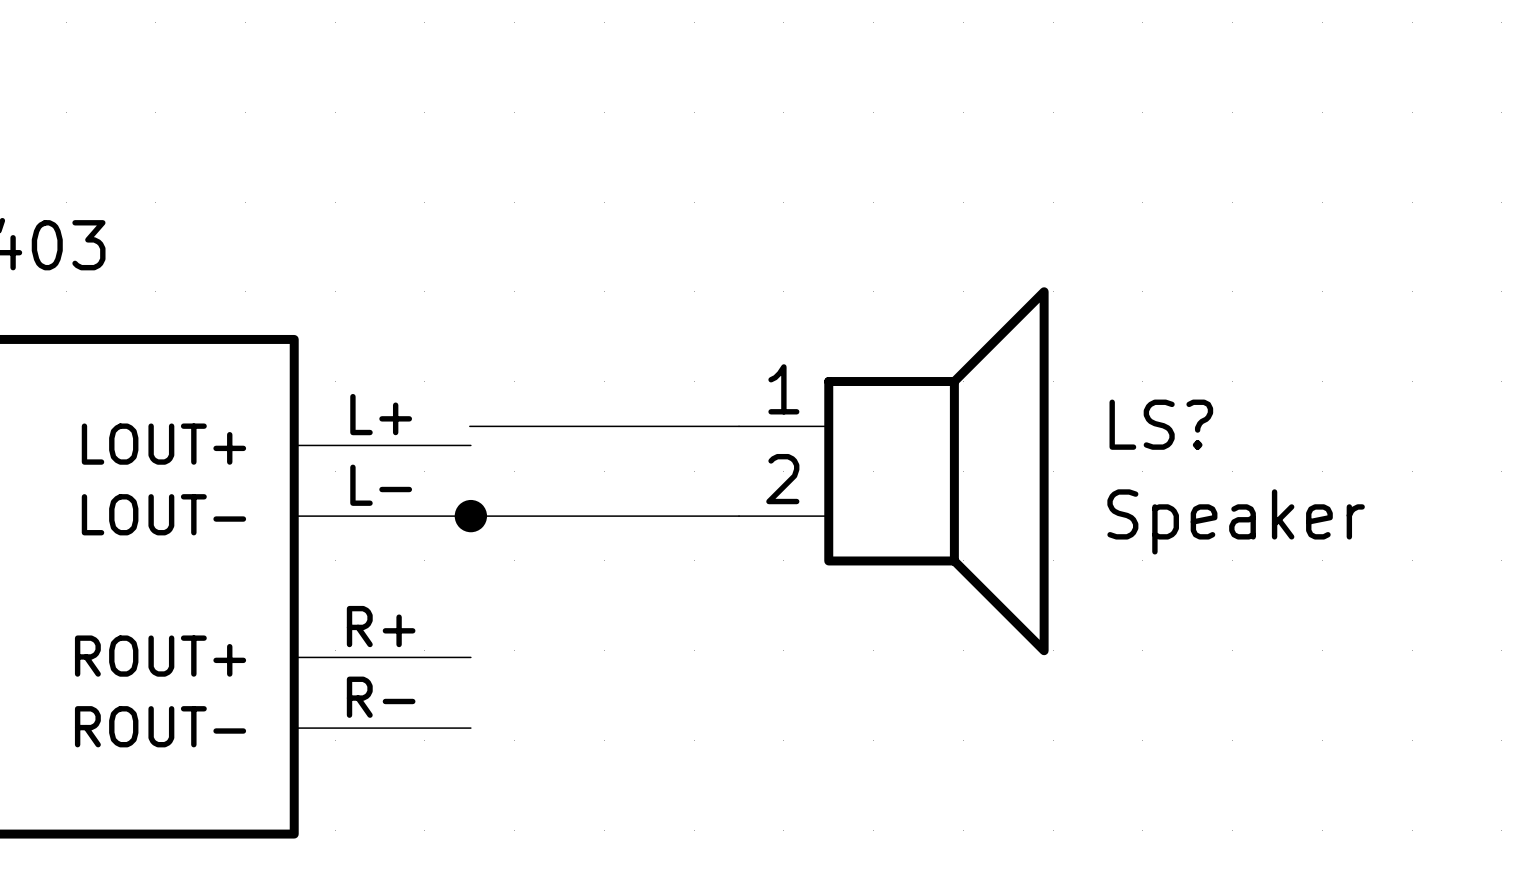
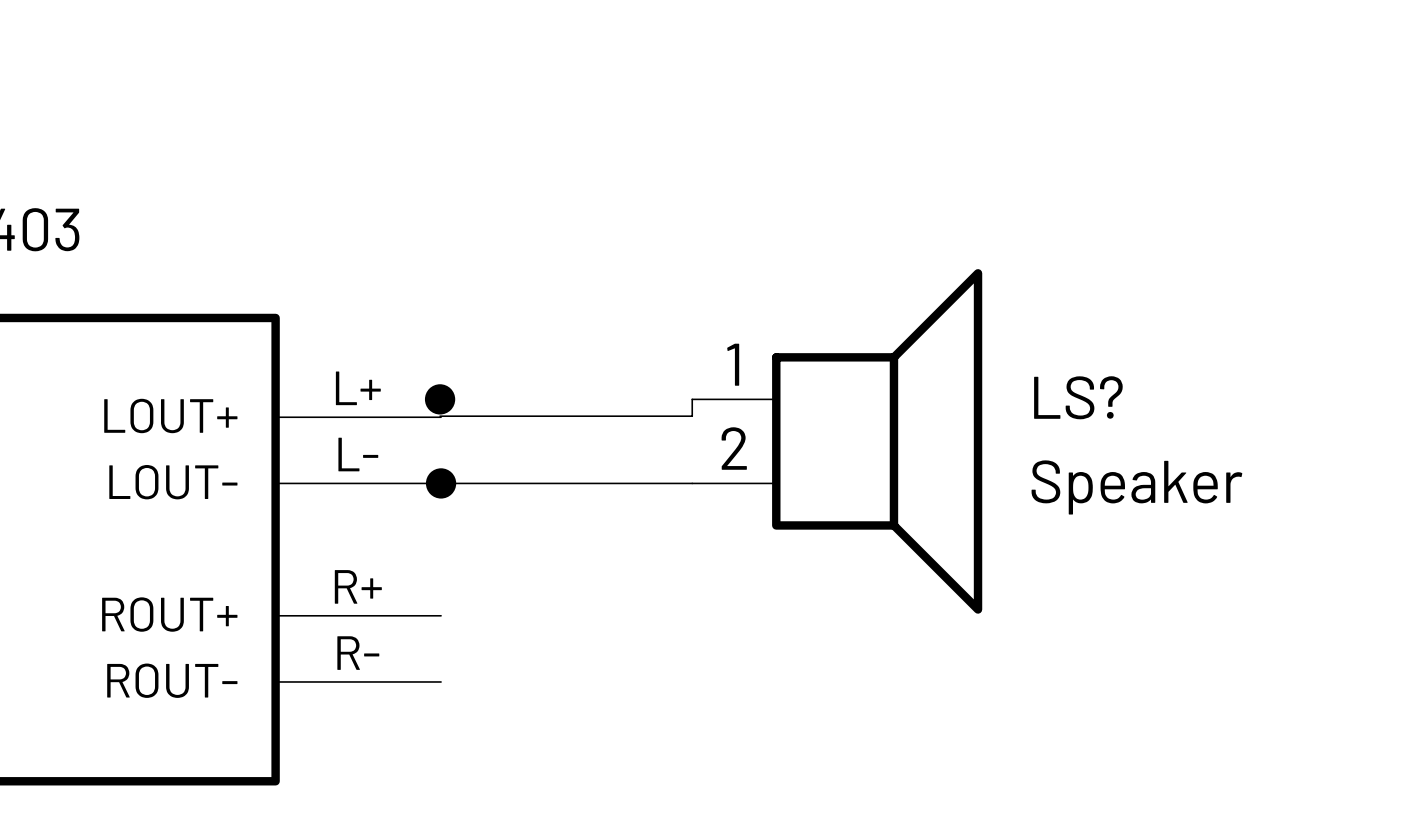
wire: (469, 426) (739, 426) -> (440, 416) (692, 416) (692, 399)
junction: none -> (440, 399)

